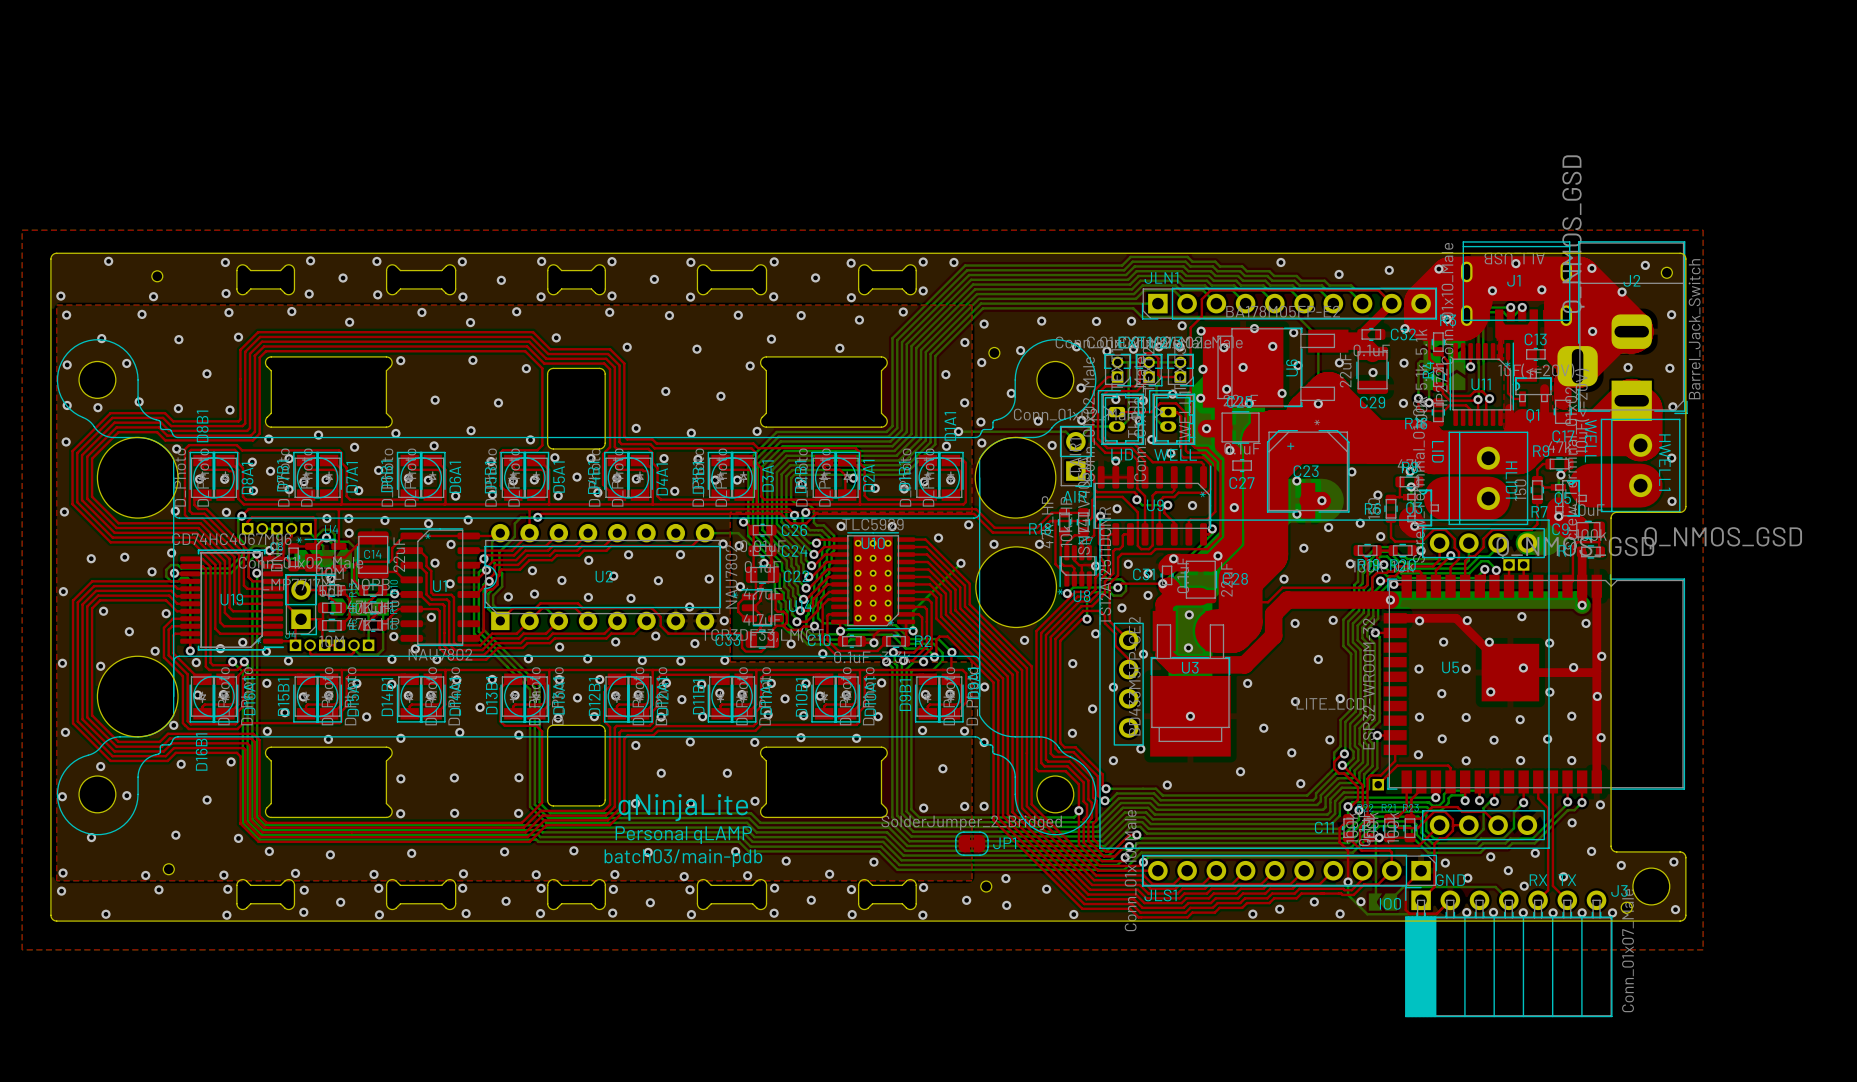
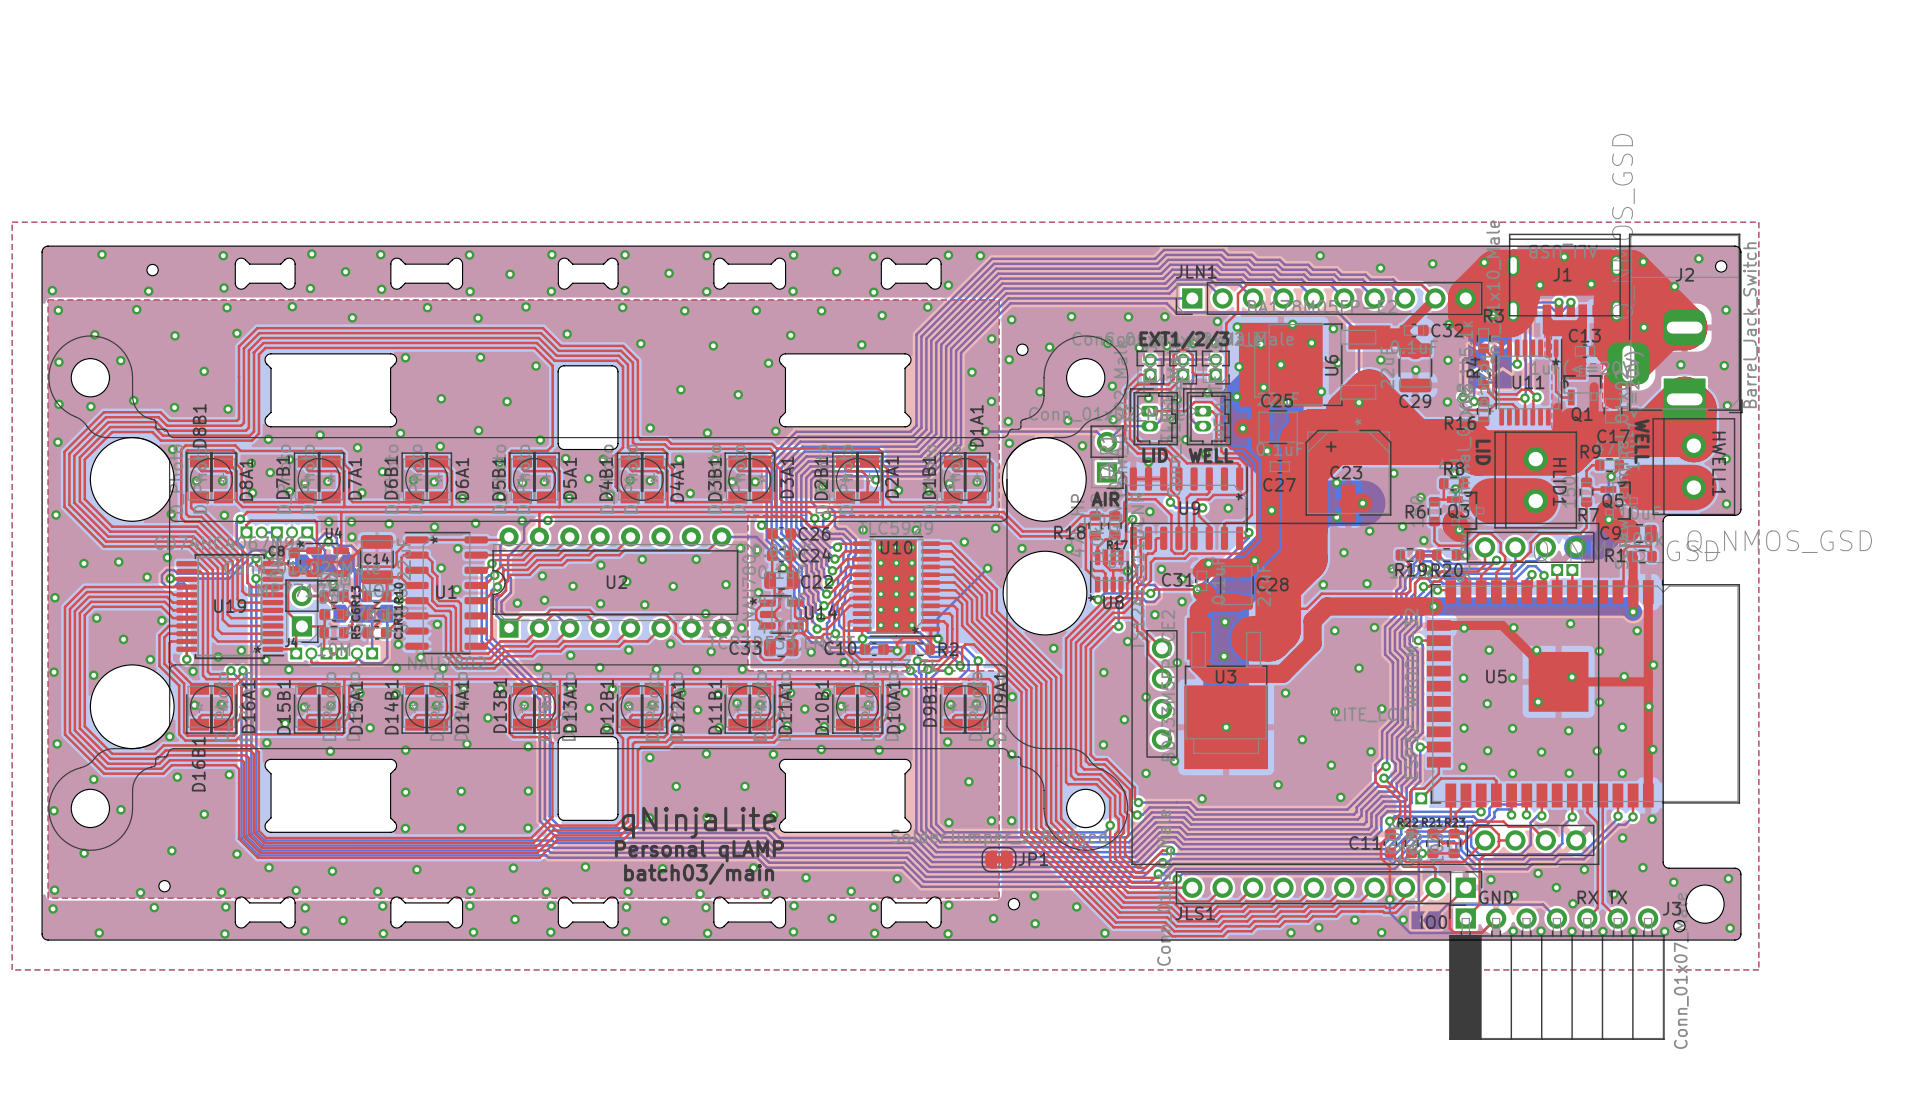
via: none -> (522, 520)
text: batch03/main-pdb (683, 858) -> batch03/main (699, 874)

